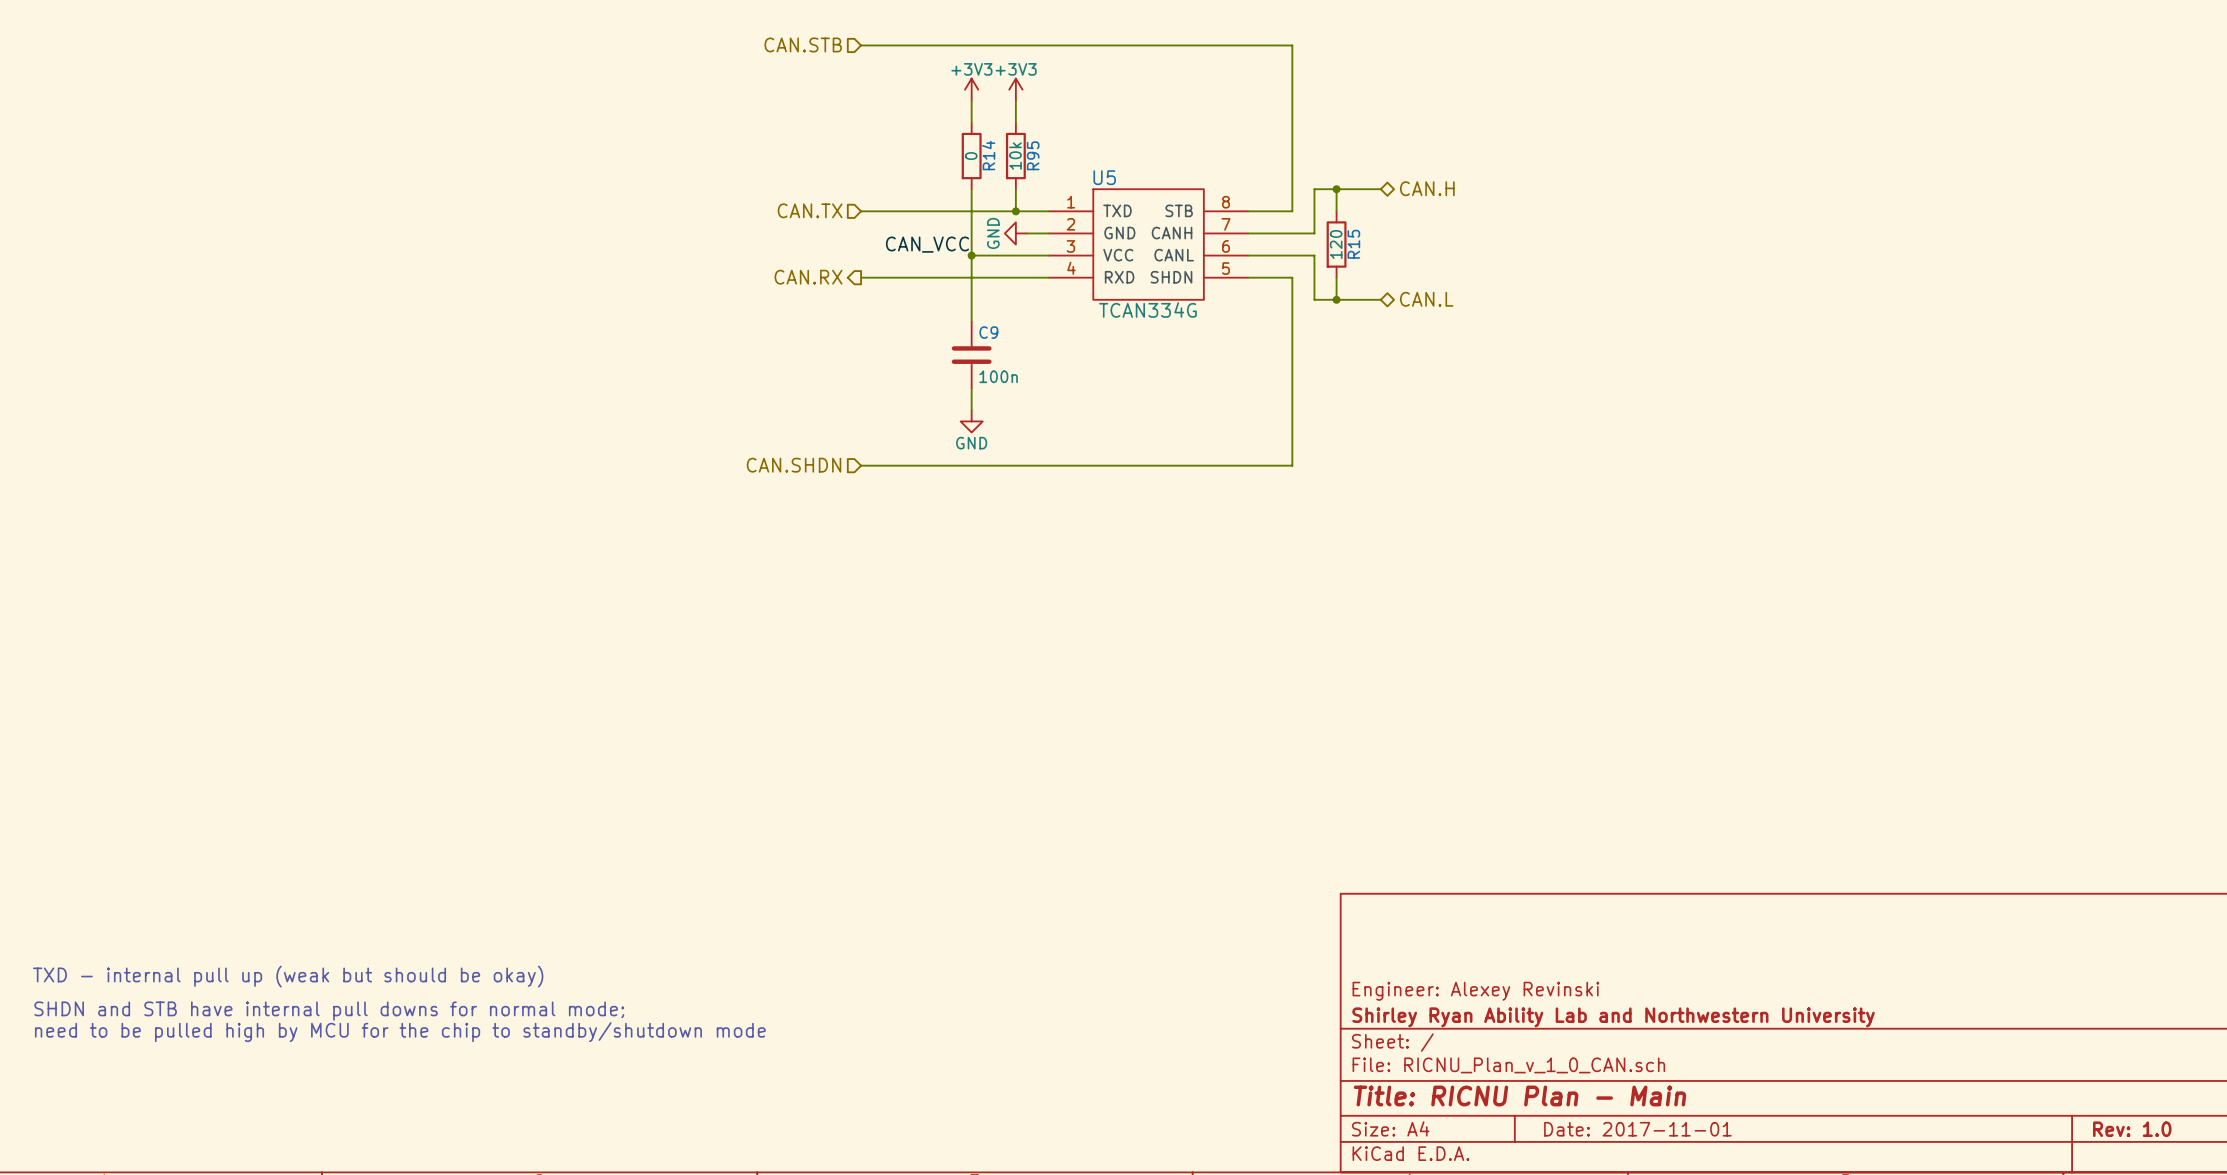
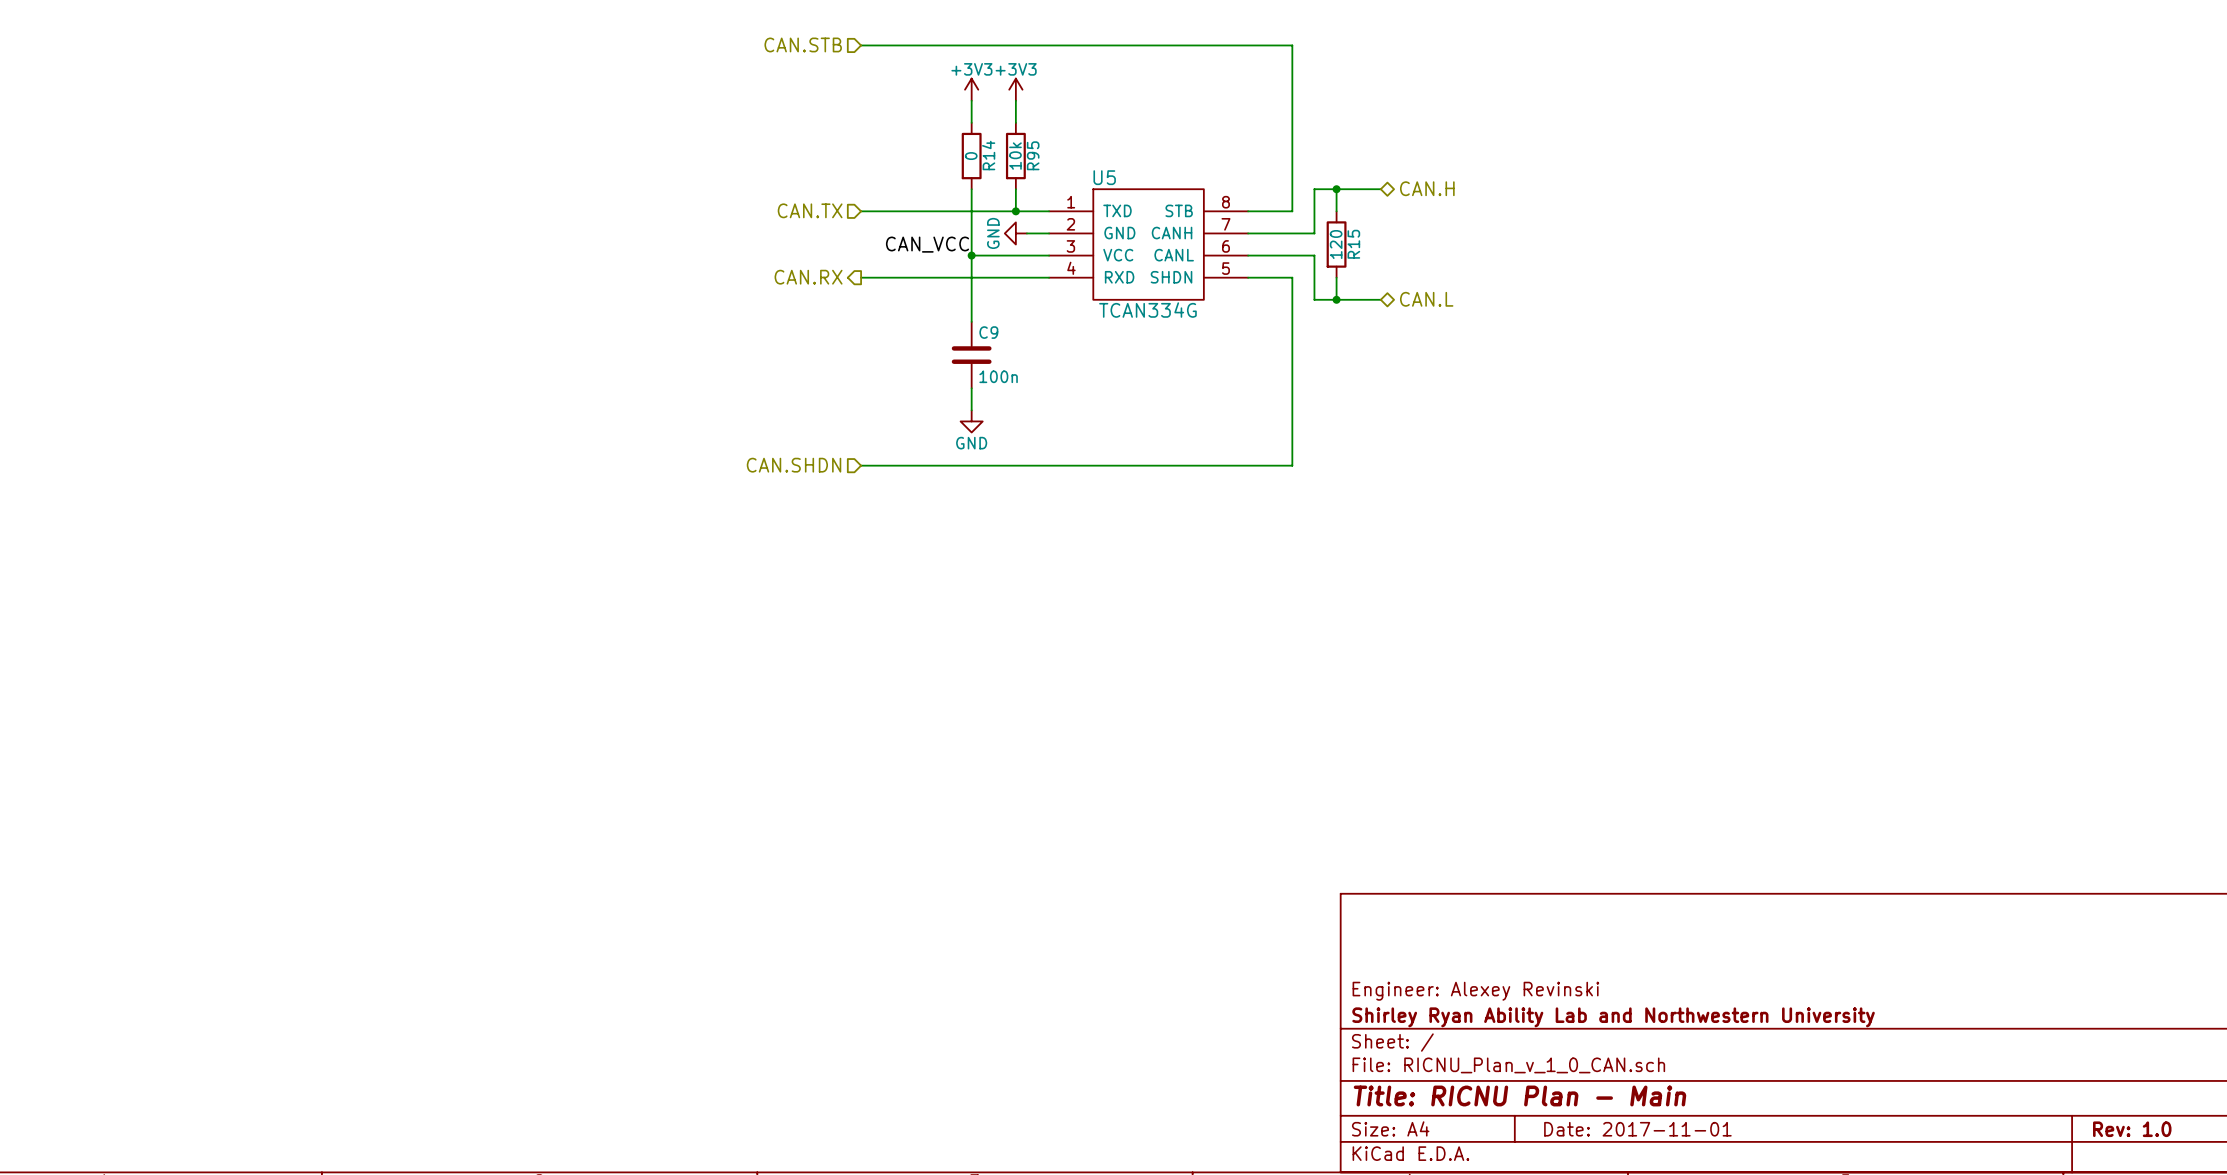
text: TXD - internal pull up (weak but should be okay) (288, 976) -> none
text: SHDN and STB have internal pull downs for normal mode; (329, 1011) -> none
text: need to be pulled high by MCU for the chip to standby/shutdown mode (400, 1032) -> none

